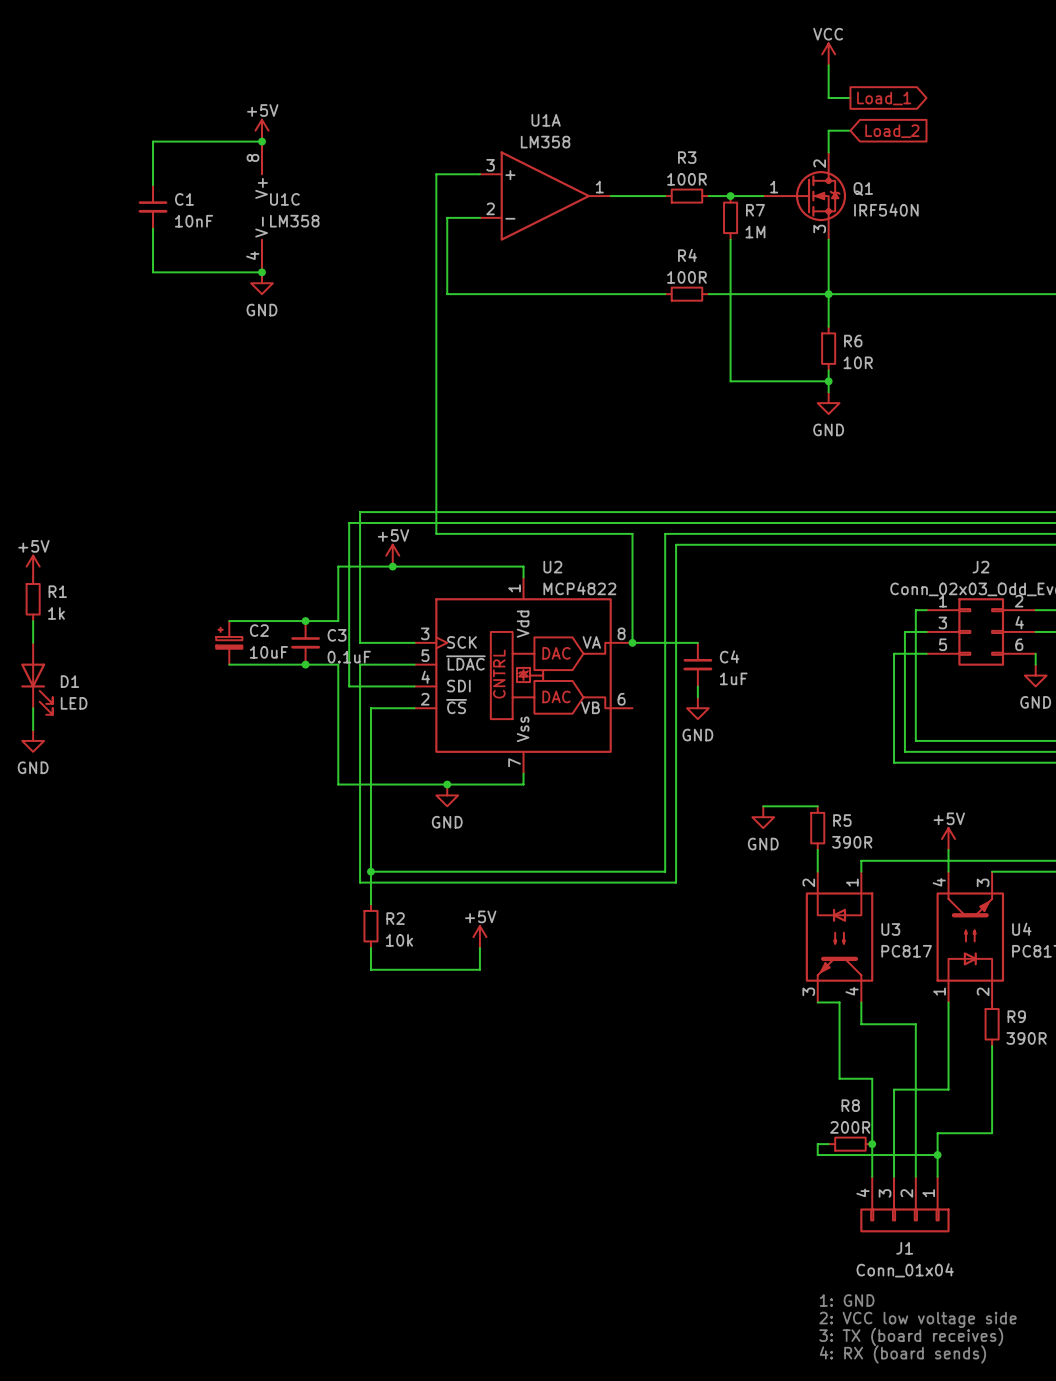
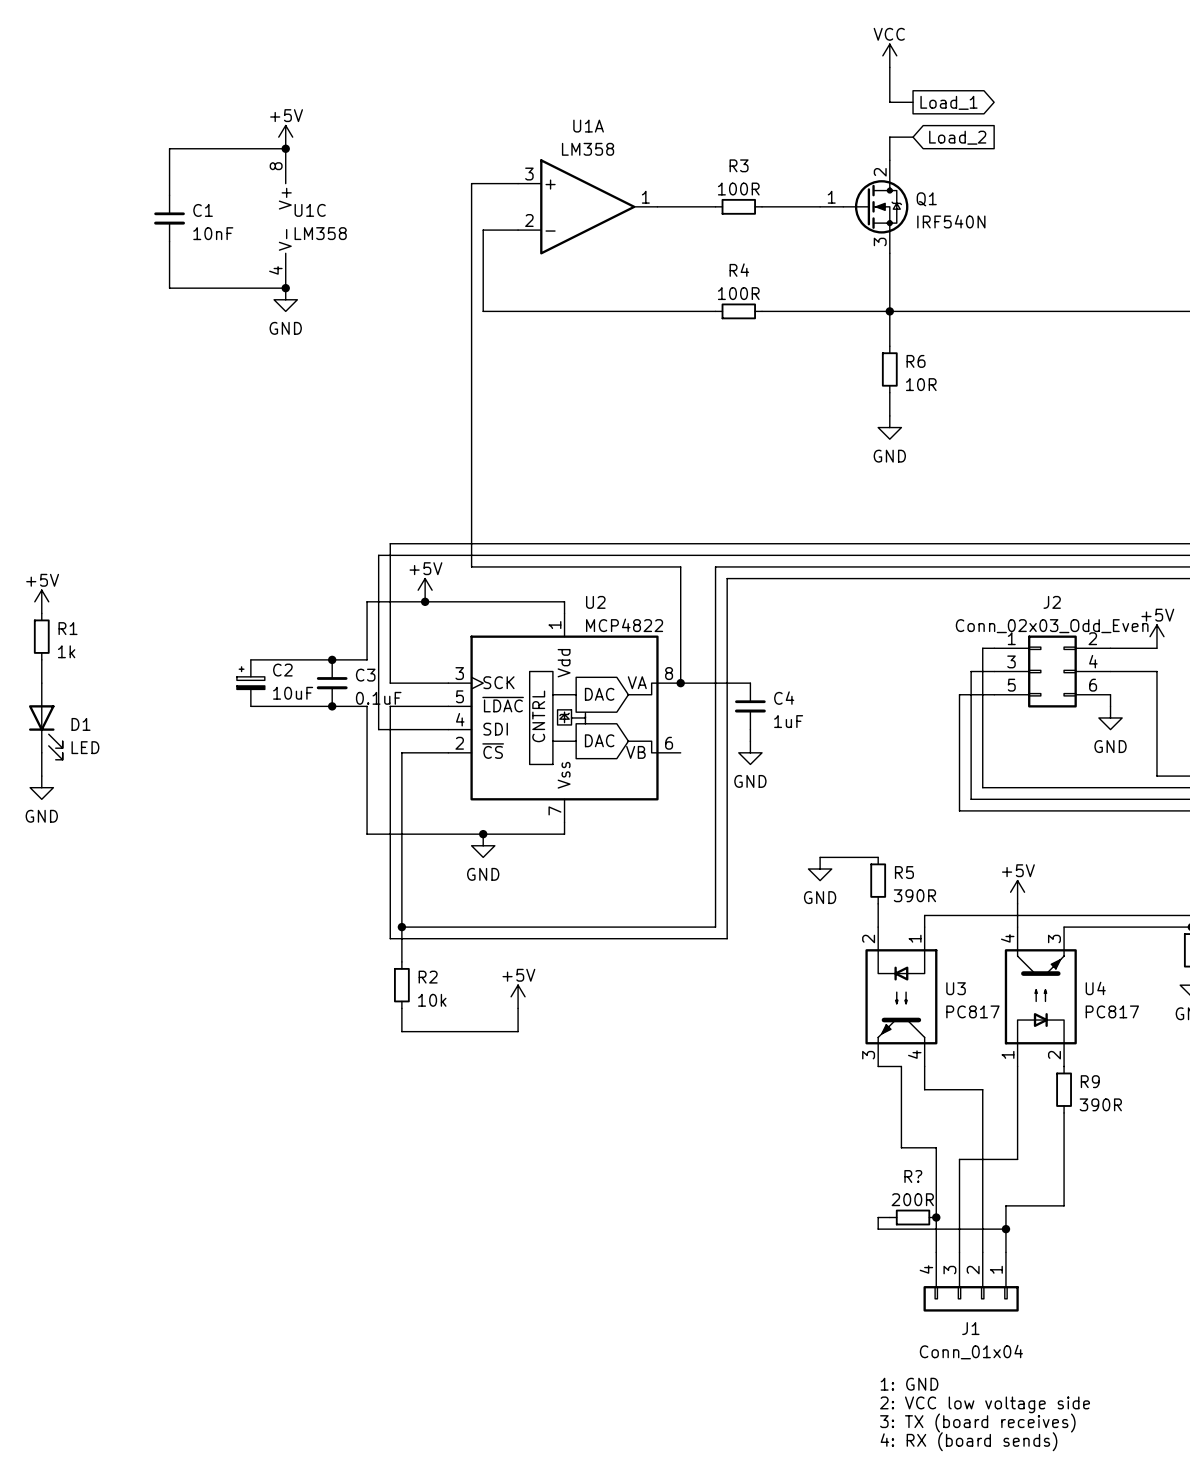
junction: (730, 196) -> none
R7: 1M (730, 217) -> none
wire: (730, 239) (730, 381) (828, 381) -> none
junction: (828, 381) -> none
R8 name: R8 (850, 1105) -> R? (913, 1176)

